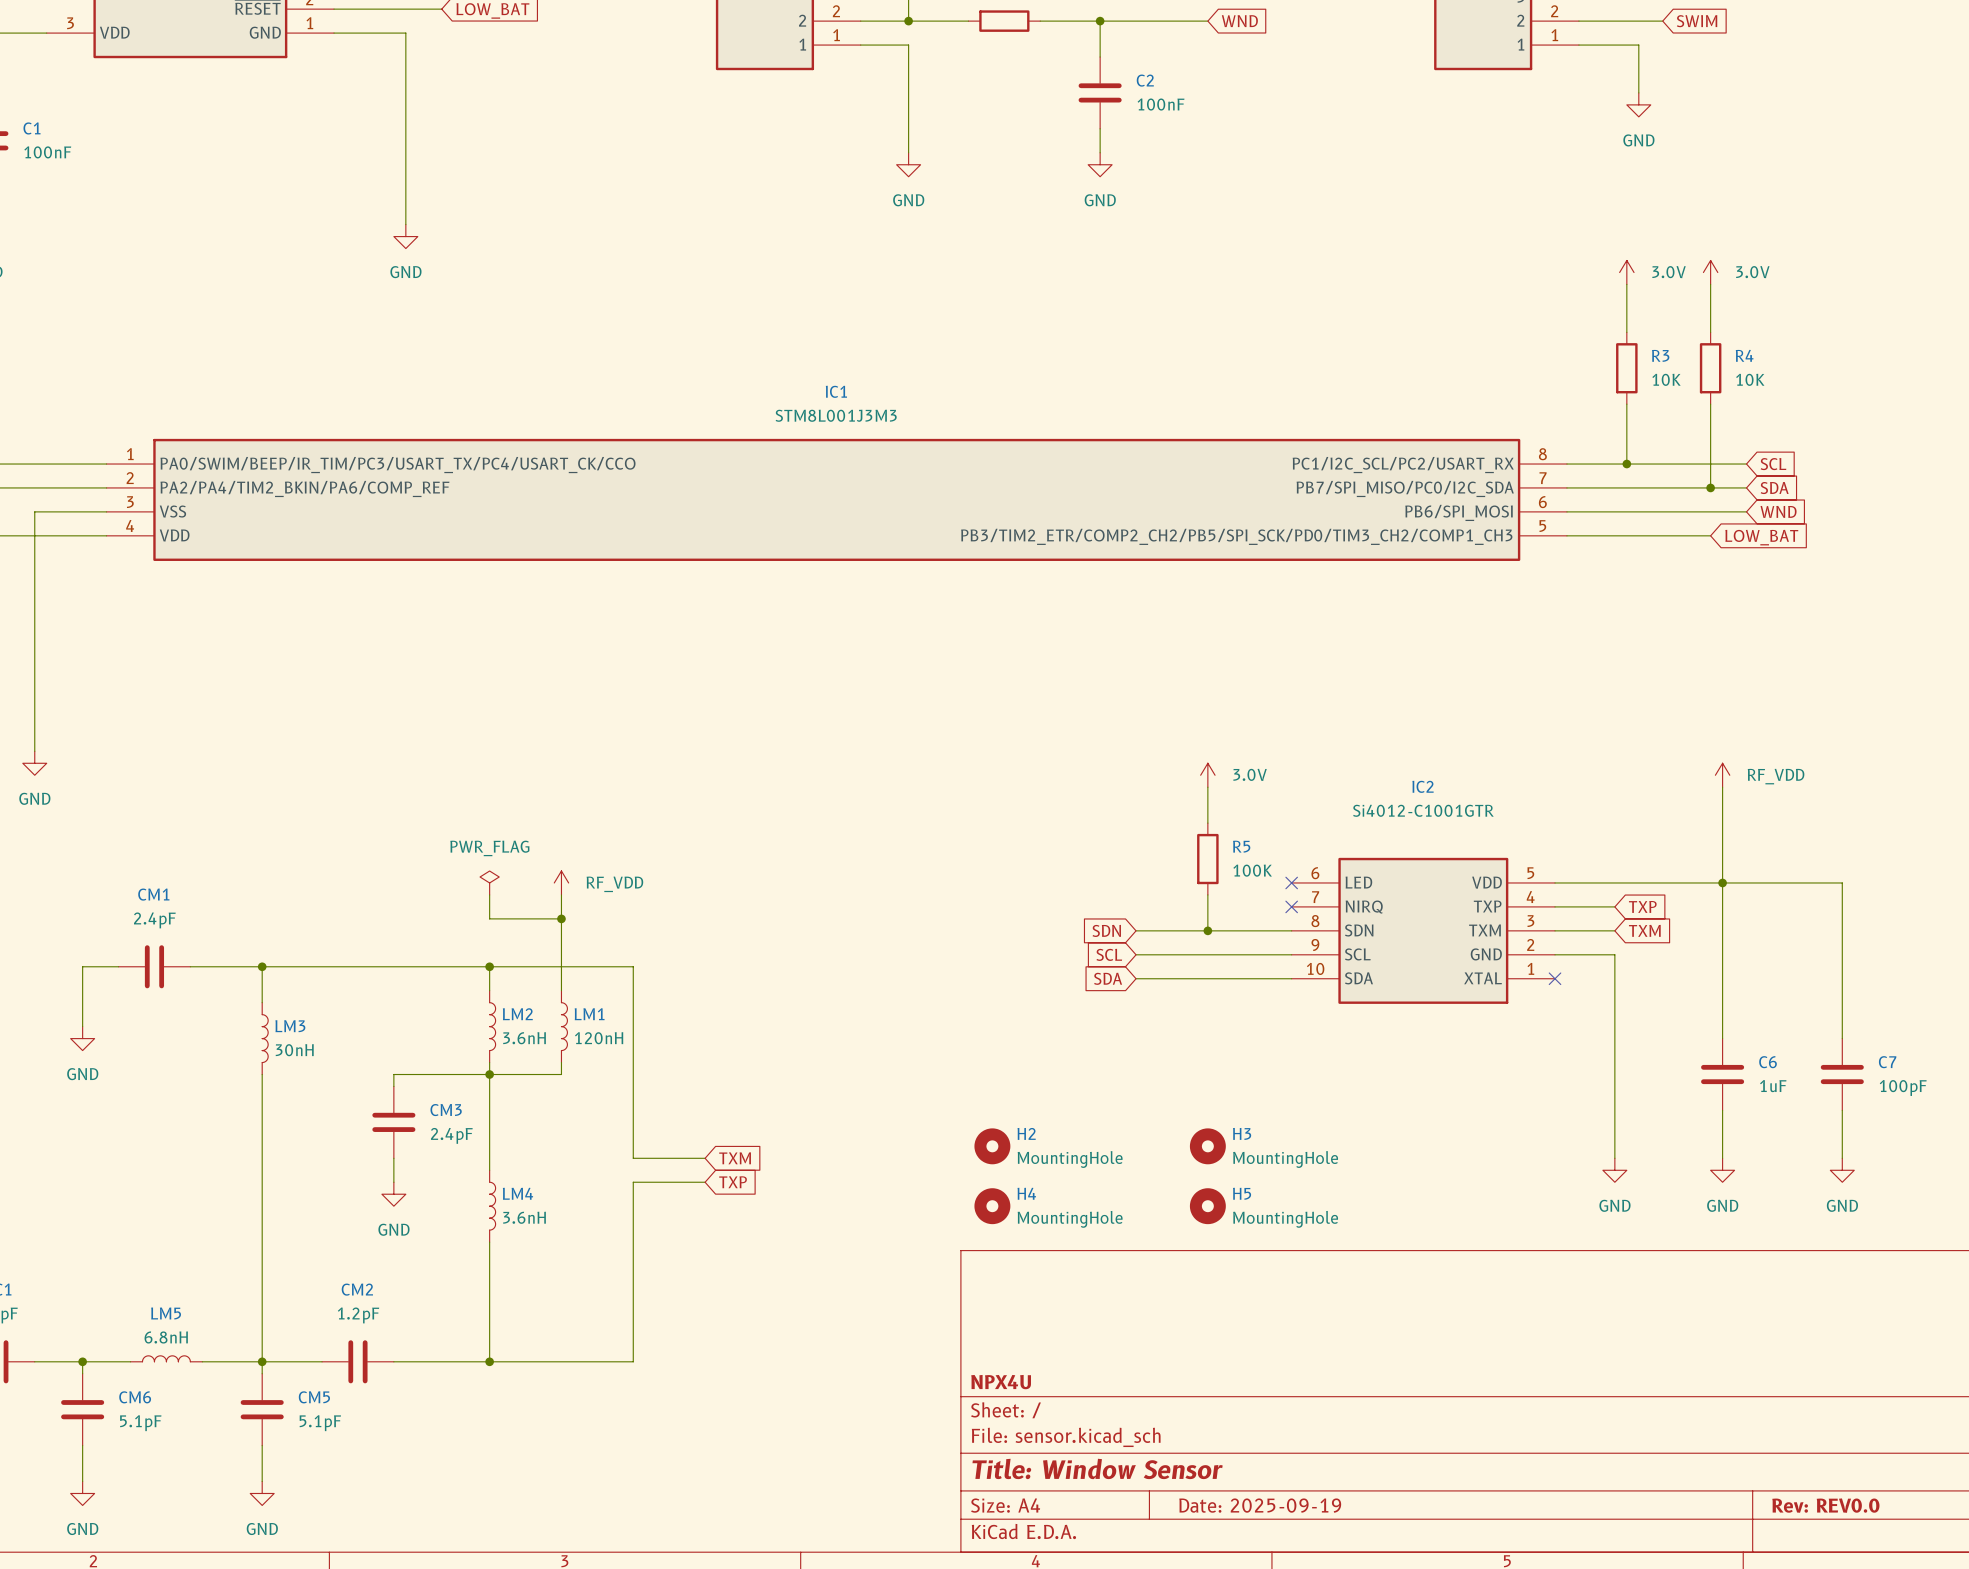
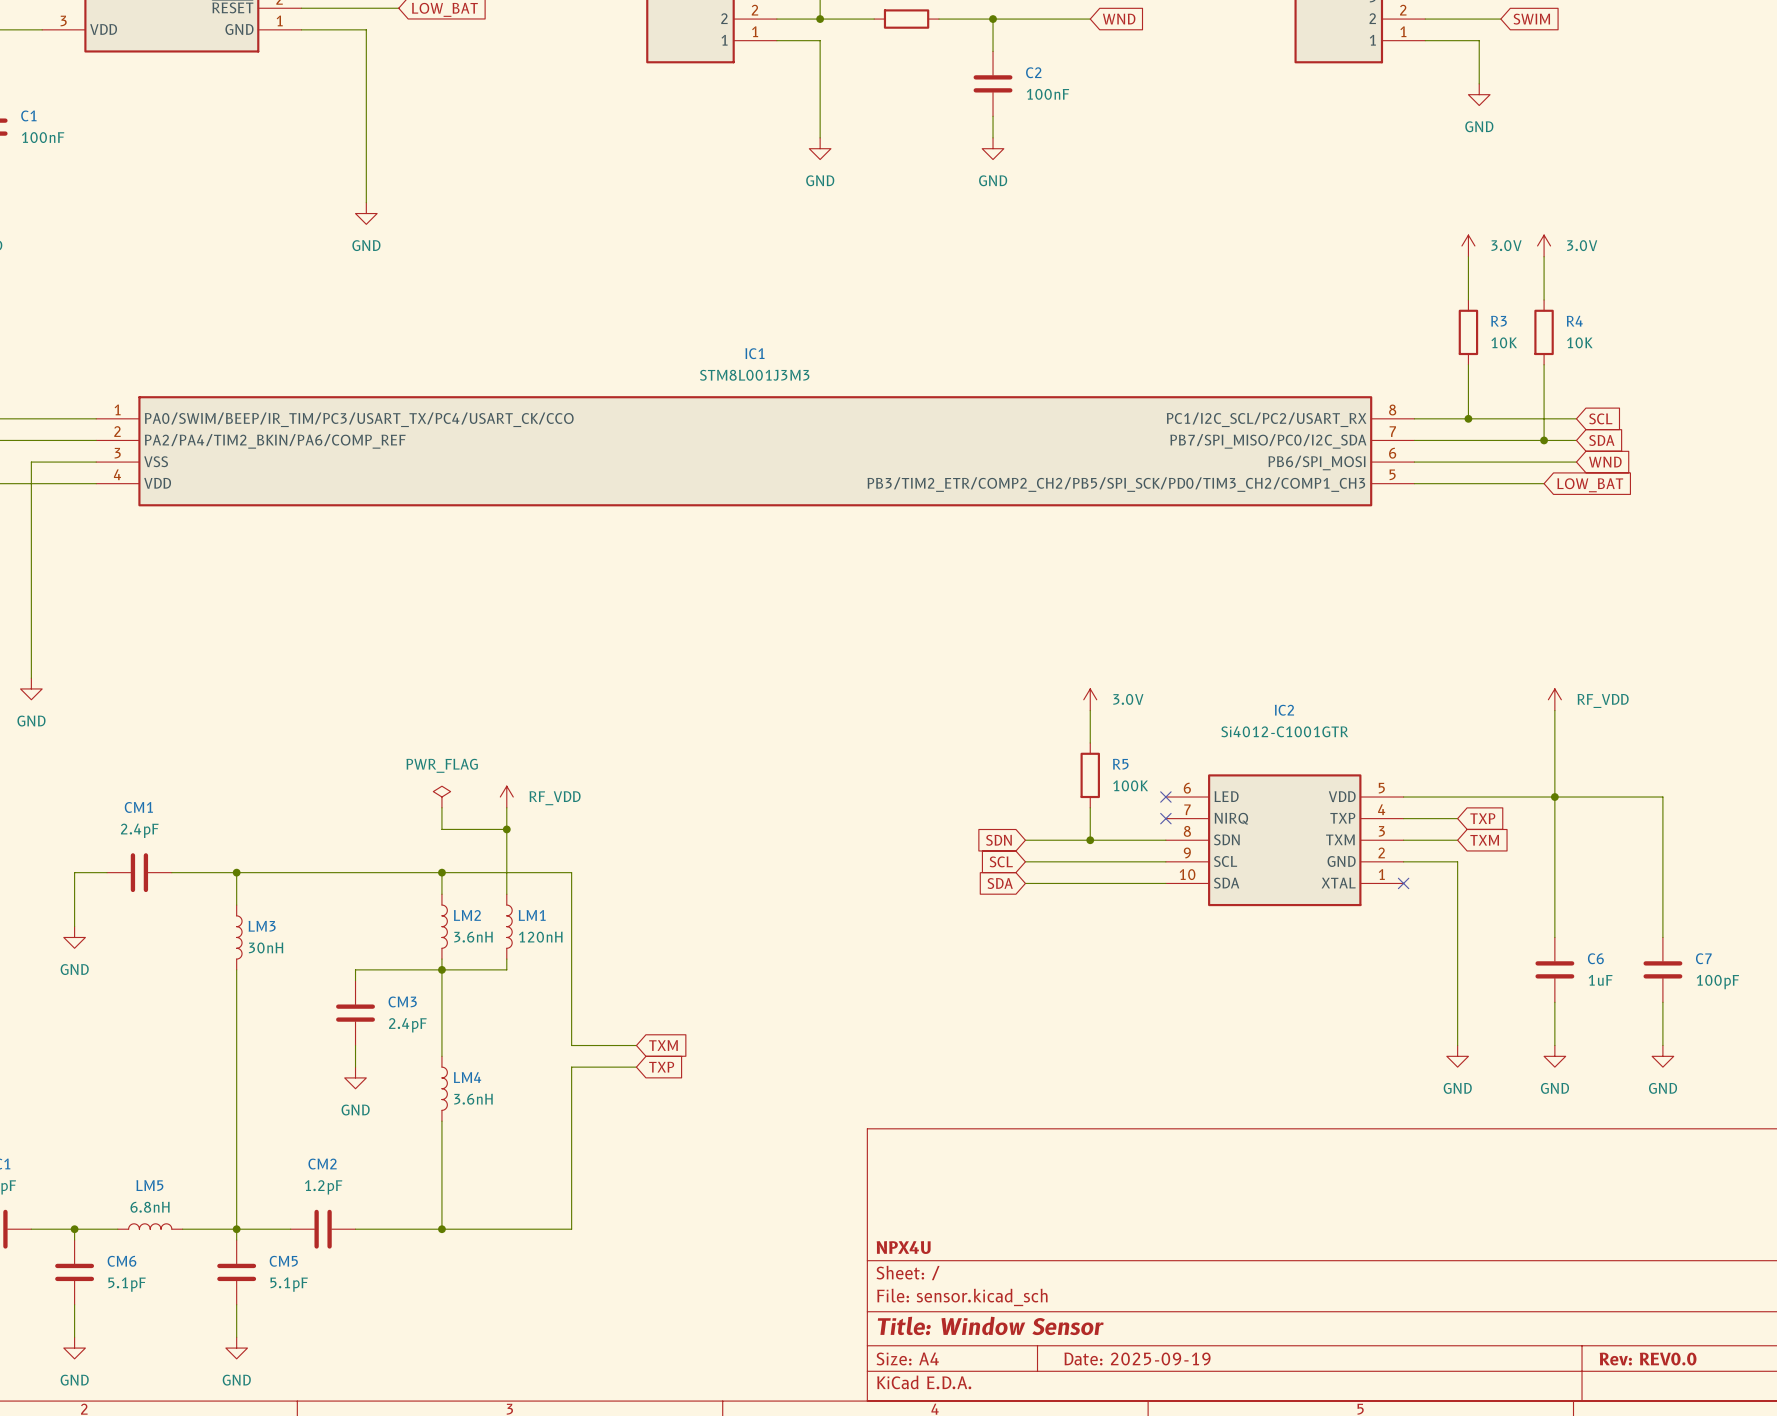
H2: MountingHole (992, 1146) -> none
H3: MountingHole (1207, 1146) -> none
H4: MountingHole (992, 1206) -> none
H5: MountingHole (1207, 1206) -> none

